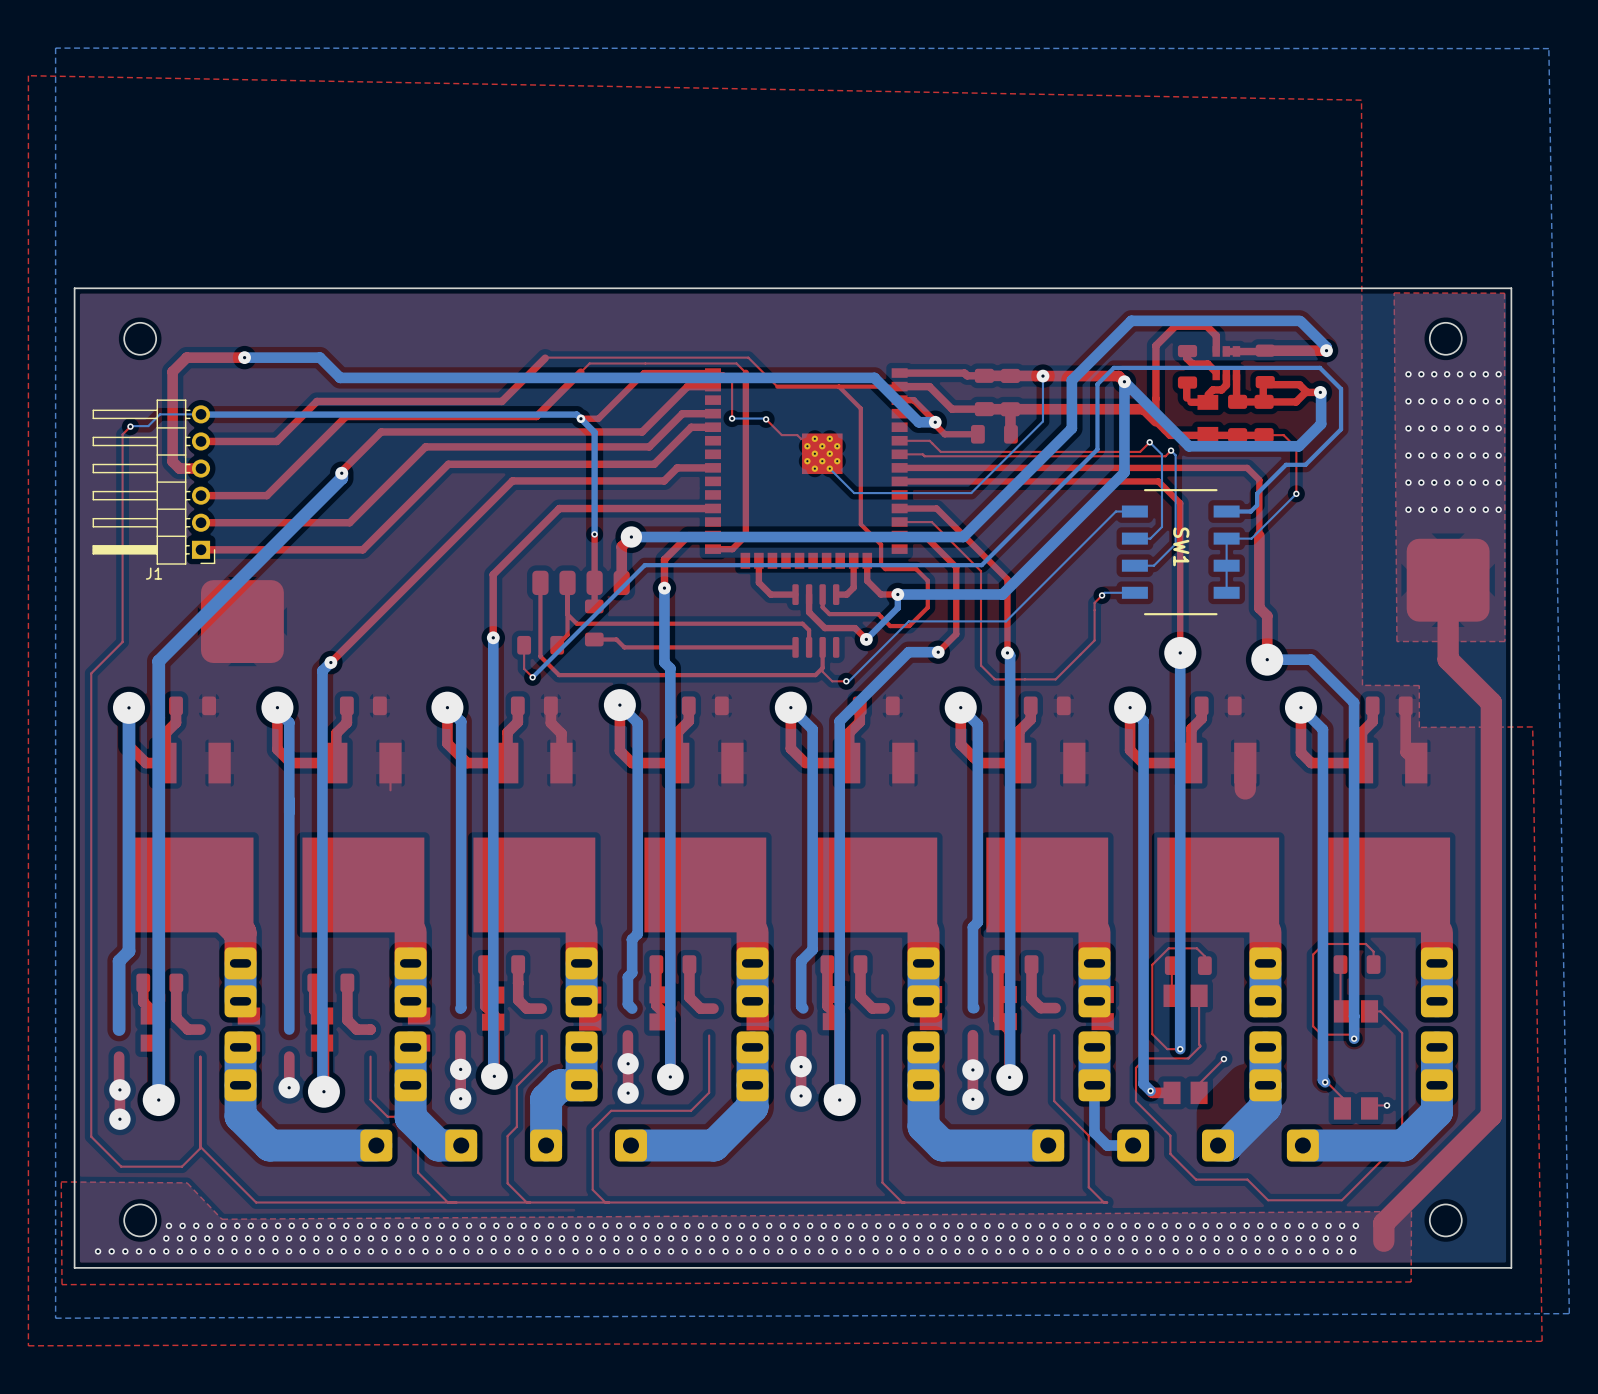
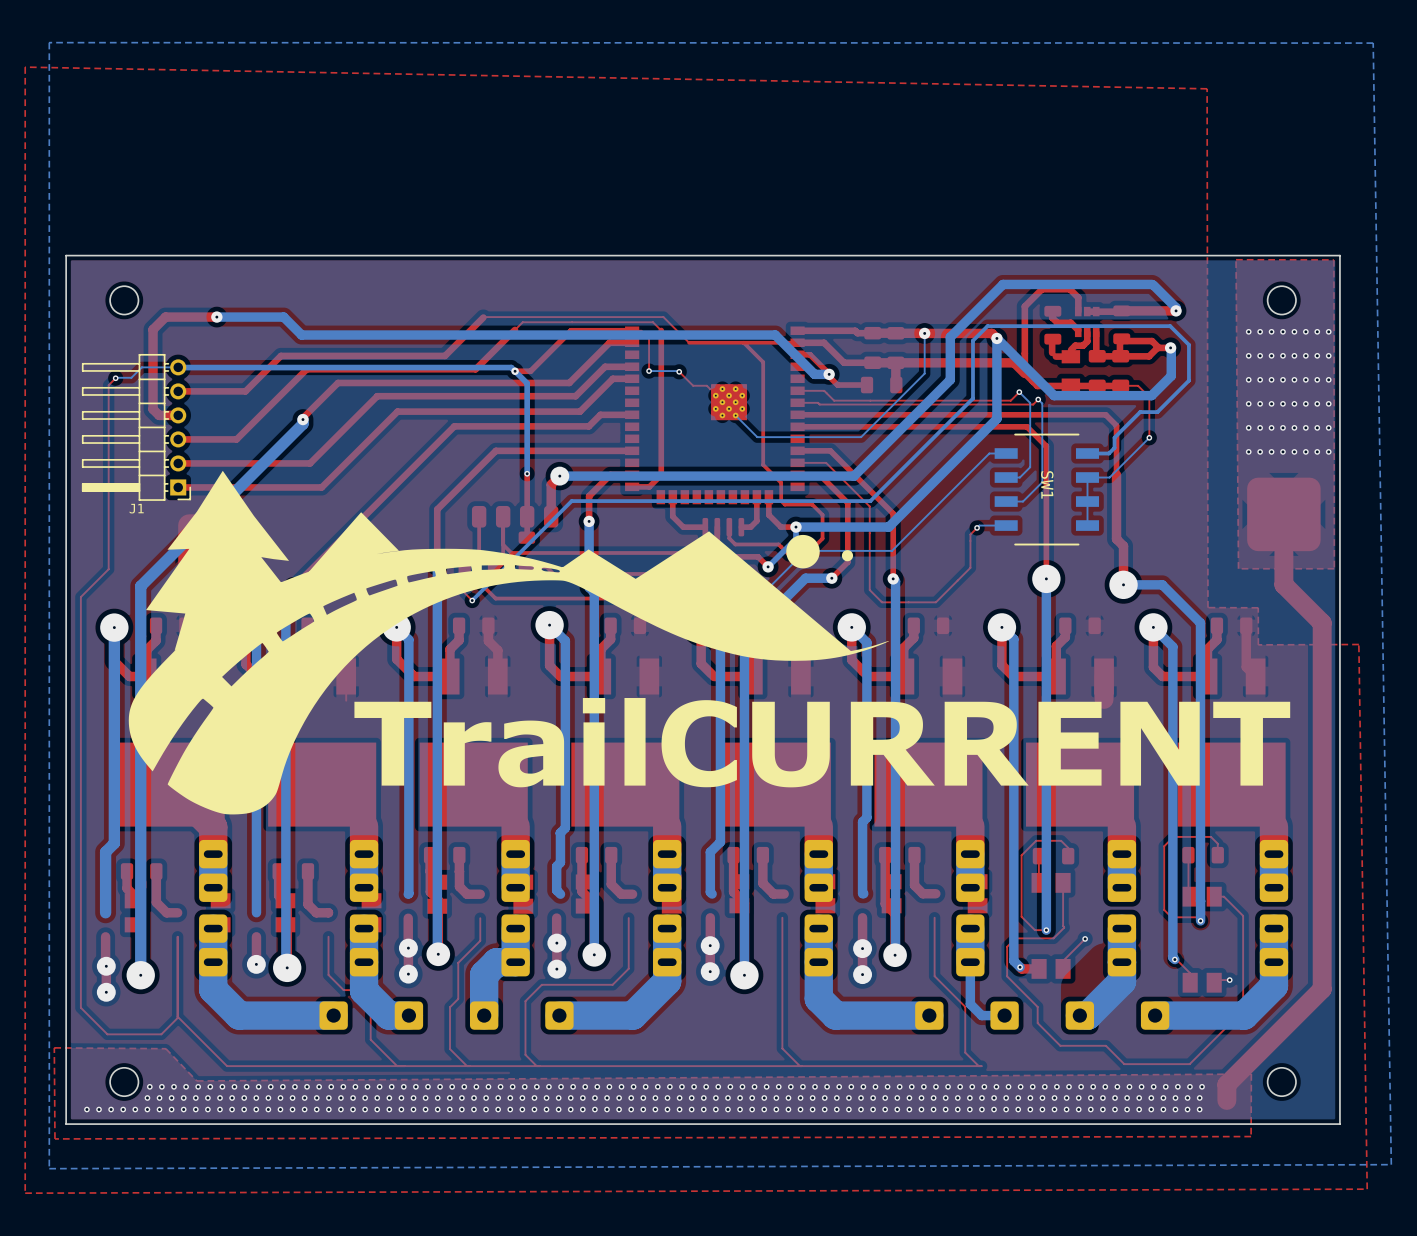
drawing: none -> [128, 470, 1102, 815]
drawing: none -> [1120, 701, 1200, 786]
drawing: none -> [1213, 701, 1291, 786]

